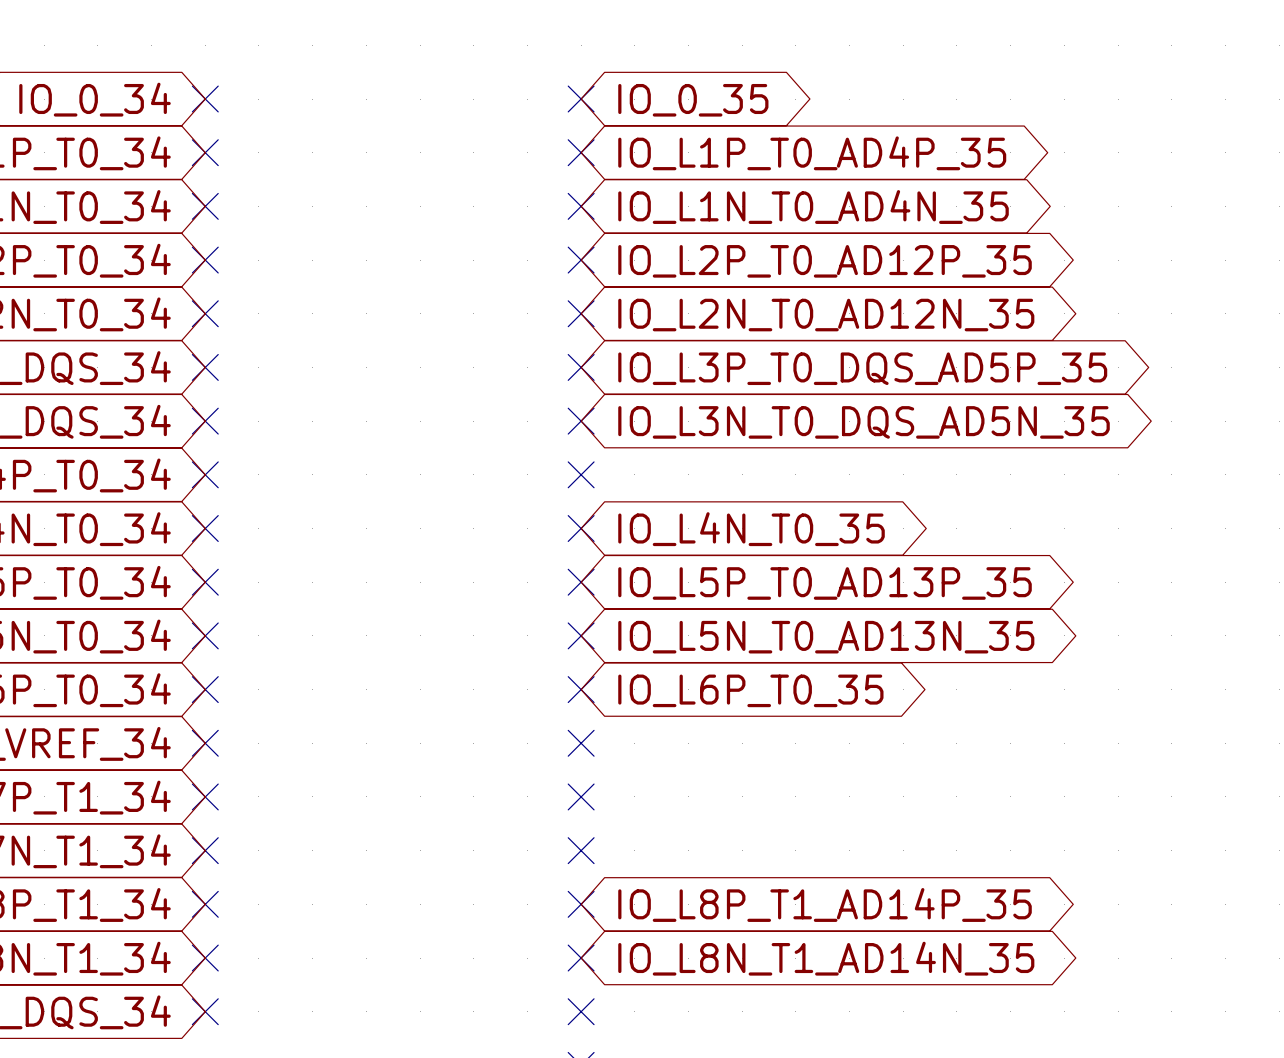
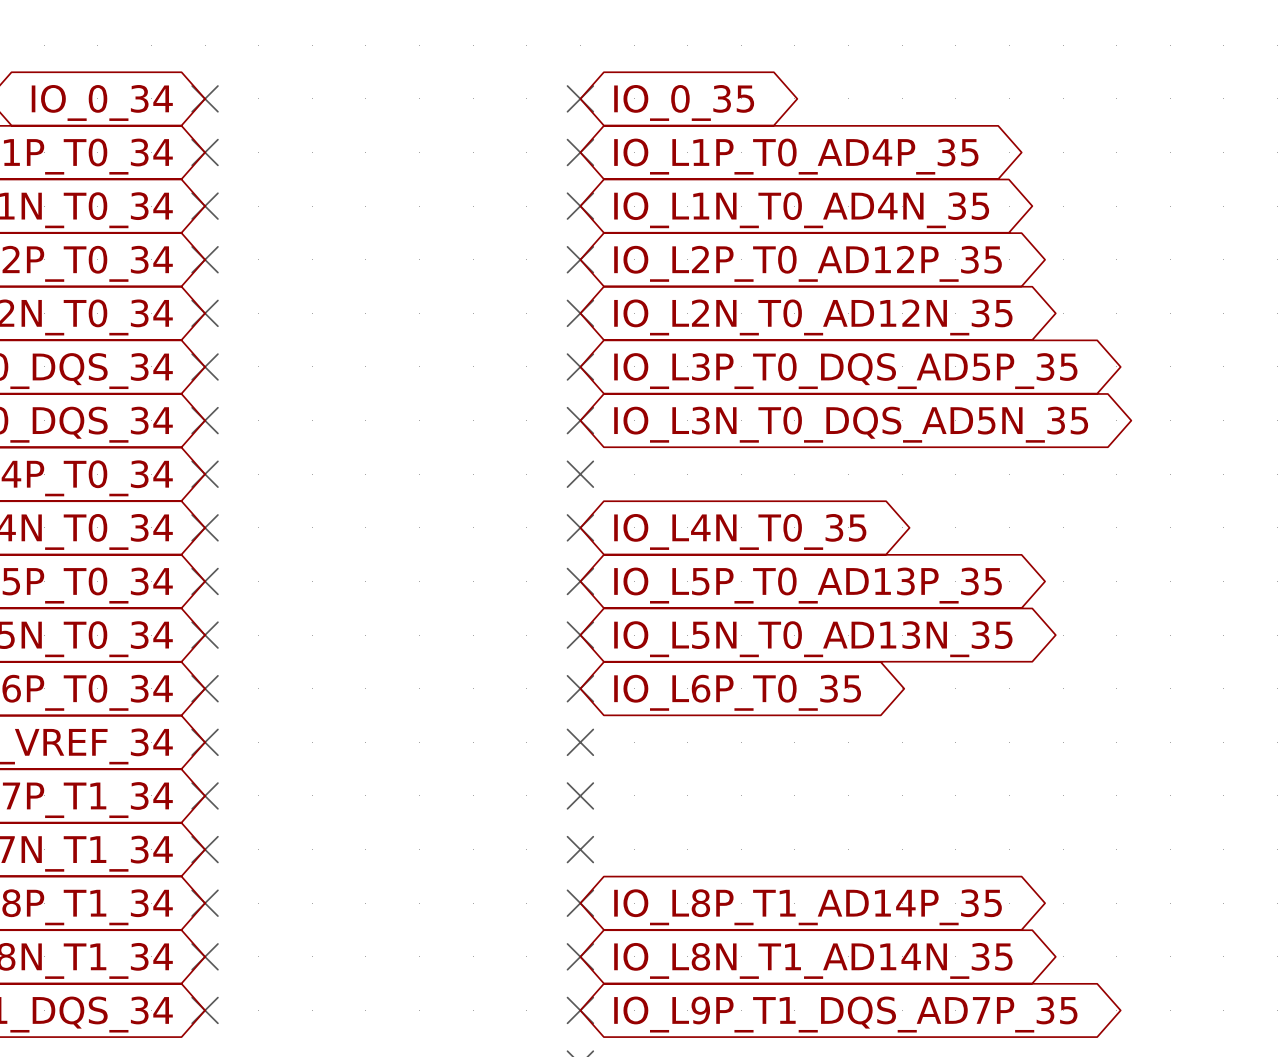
global label: none -> IO_L9P_T1_DQS_AD7P_35 (845, 1014)

